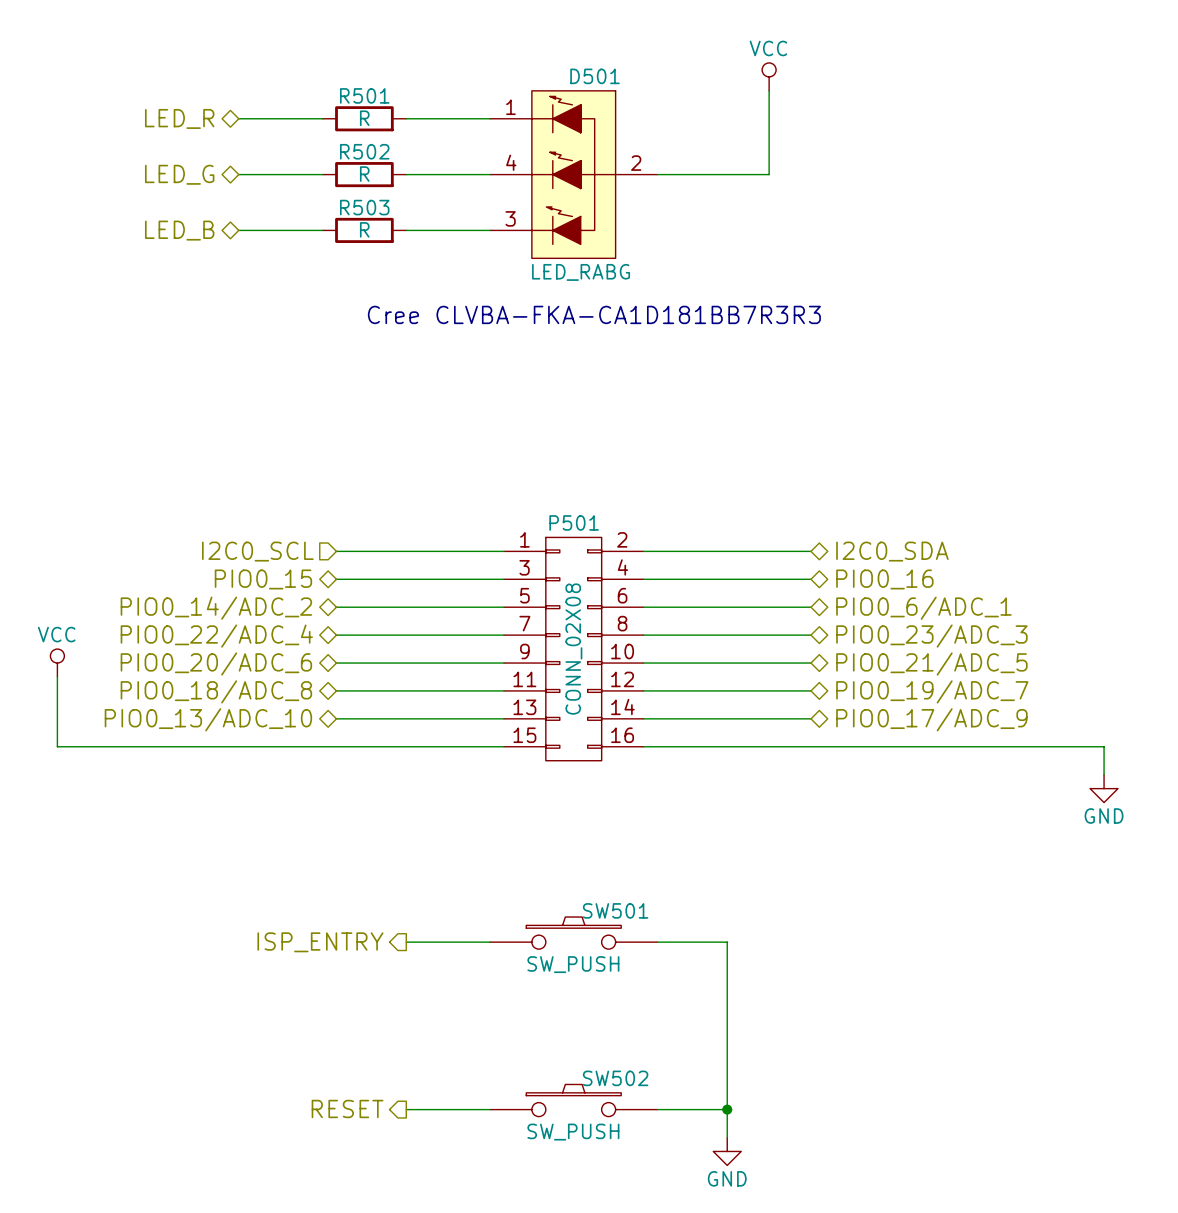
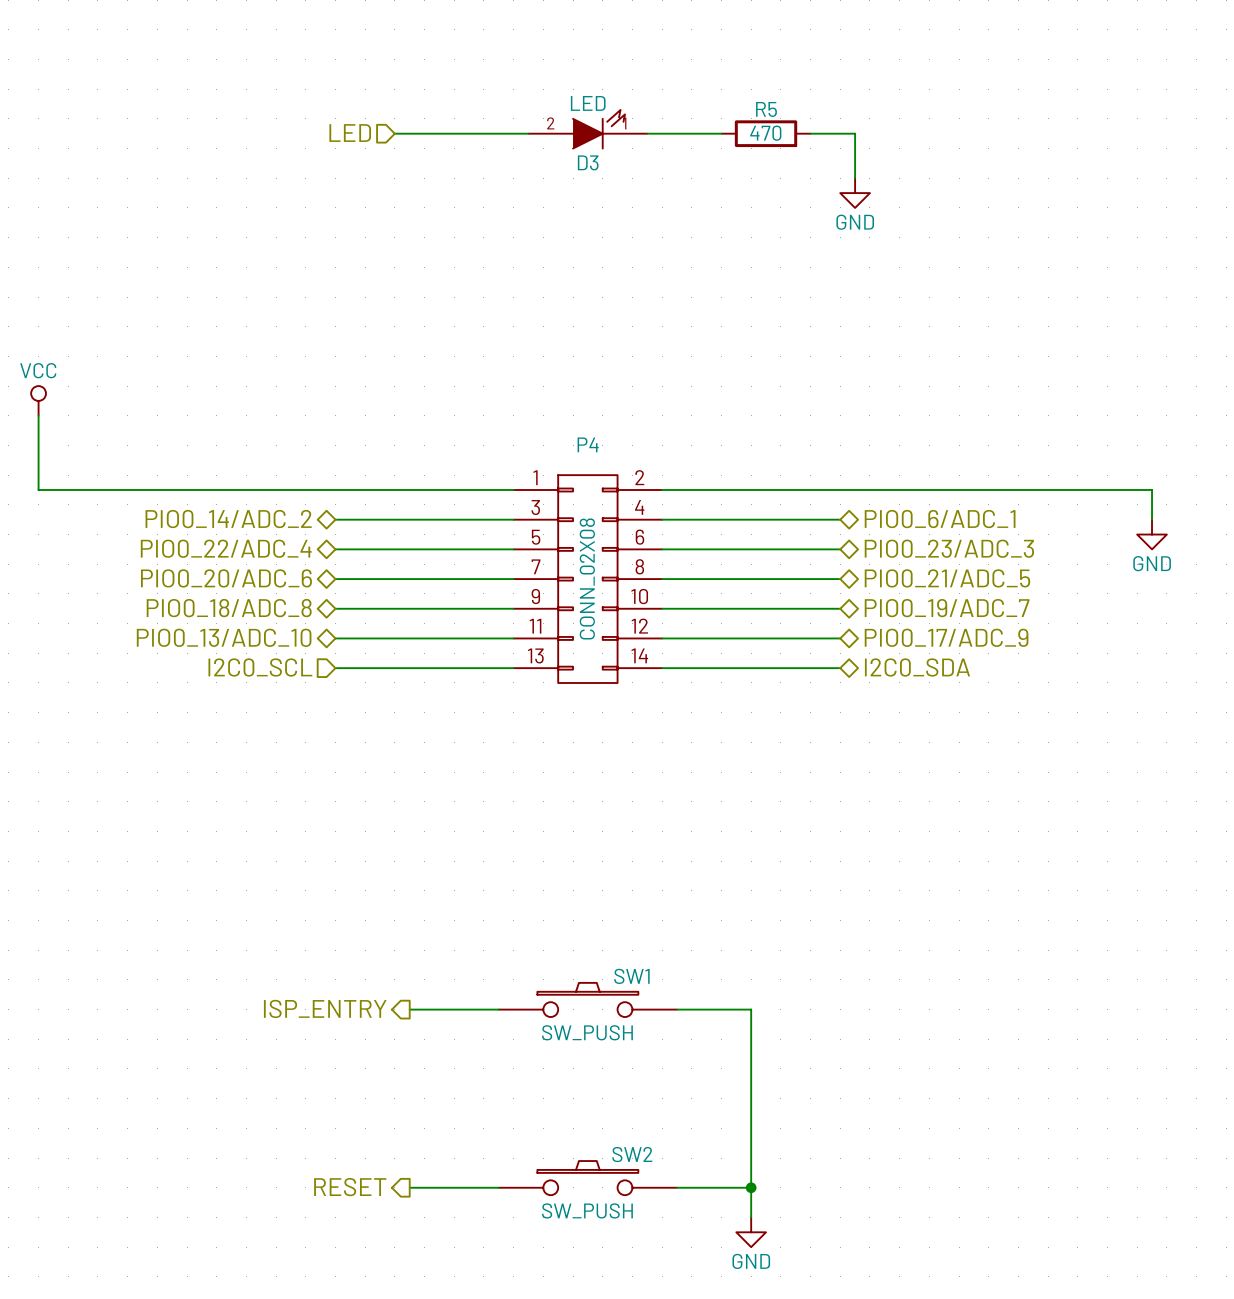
power symbol: VCC (769, 76) -> none
wire: (769, 90) (769, 174) (657, 174) -> none
D3: none -> LED (587, 129)
hierarchical label: LED_R (179, 118) -> none
wire: (238, 118) (322, 118) -> none
hierarchical label: none -> LED (350, 133)
R501: R (364, 118) -> none
wire: none -> (647, 133) (721, 133)
R5: none -> 470 (766, 133)
wire: none -> (810, 133) (855, 133) (855, 178)
hierarchical label: LED_G (179, 174) -> none
wire: (238, 174) (322, 174) -> none
R502: R (364, 174) -> none
wire: (406, 174) (490, 174) -> none
D501: LED_RABG (573, 174) -> none
power symbol: none -> GND (855, 193)
hierarchical label: LED_B (179, 230) -> none
wire: (238, 230) (322, 230) -> none
R503: R (364, 230) -> none
wire: (406, 230) (490, 230) -> none
text: Cree CLVBA-FKA-CA1D181BB7R3R3 (594, 314) -> none
power symbol: none -> VCC (38, 400)
wire: none -> (38, 415) (38, 490) (513, 490)
wire: none -> (662, 490) (1152, 490) (1152, 519)
power symbol: none -> GND (1152, 534)
P4: none -> CONN_02X08 (587, 579)
hierarchical label position: I2C0_SCL (257, 551) -> I2C0_SCL (260, 667)
wire: (336, 551) (503, 551) -> (335, 519) (513, 519)
wire: (643, 551) (810, 551) -> (662, 519) (840, 519)
hierarchical label position: I2C0_SDA (892, 551) -> I2C0_SDA (917, 667)
hierarchical label: PIO0_15 (263, 579) -> none
wire: (336, 579) (503, 579) -> (335, 549) (513, 549)
wire: (643, 579) (810, 579) -> (662, 549) (840, 549)
hierarchical label: PIO0_16 (884, 579) -> none
wire: (336, 607) (503, 607) -> (335, 579) (513, 579)
wire: (643, 607) (810, 607) -> (662, 579) (840, 579)
hierarchical label position: PIO0_14/ADC_2 (216, 608) -> PIO0_14/ADC_2 (228, 519)
hierarchical label position: PIO0_6/ADC_1 (923, 608) -> PIO0_6/ADC_1 (940, 519)
wire: (336, 635) (503, 635) -> (335, 608) (513, 608)
wire: (643, 635) (810, 635) -> (662, 608) (840, 608)
hierarchical label position: PIO0_22/ADC_4 (216, 636) -> PIO0_22/ADC_4 (226, 548)
hierarchical label position: PIO0_23/ADC_3 (931, 636) -> PIO0_23/ADC_3 (949, 548)
P501: CONN_02X08 (573, 649) -> none
power symbol: VCC (57, 663) -> none
wire: (336, 663) (503, 663) -> (335, 638) (513, 638)
wire: (643, 663) (810, 663) -> (662, 638) (840, 638)
hierarchical label position: PIO0_20/ADC_6 (216, 664) -> PIO0_20/ADC_6 (226, 578)
hierarchical label position: PIO0_21/ADC_5 (931, 664) -> PIO0_21/ADC_5 (947, 578)
wire: (57, 676) (57, 746) (503, 746) -> none
wire: (336, 690) (503, 690) -> (335, 668) (513, 668)
wire: (643, 690) (810, 690) -> (662, 668) (840, 668)
hierarchical label position: PIO0_18/ADC_8 (216, 691) -> PIO0_18/ADC_8 (229, 608)
hierarchical label position: PIO0_19/ADC_7 (932, 691) -> PIO0_19/ADC_7 (947, 608)
wire: (336, 718) (503, 718) -> none
wire: (643, 718) (810, 718) -> none
hierarchical label position: PIO0_13/ADC_10 (208, 719) -> PIO0_13/ADC_10 (224, 637)
hierarchical label position: PIO0_17/ADC_9 (931, 719) -> PIO0_17/ADC_9 (946, 637)
wire: (643, 746) (1104, 746) (1104, 774) -> none
power symbol: GND (1104, 788) -> none
SW501 name: SW501 (615, 910) -> SW1 (631, 976)
SW502 name: SW502 (615, 1078) -> SW2 (632, 1154)

